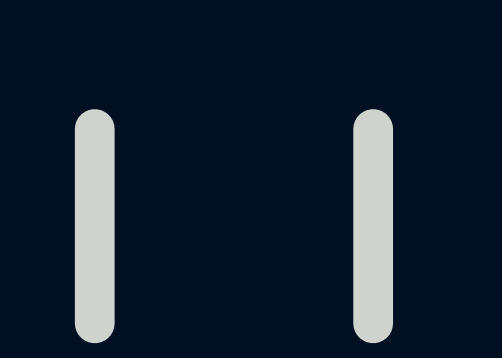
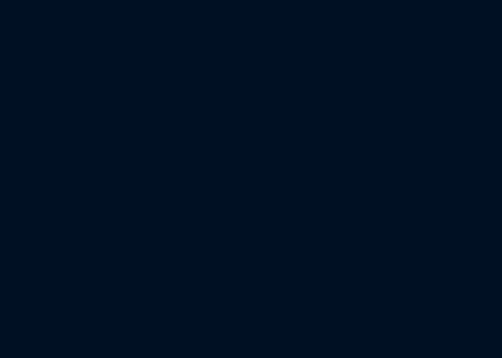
board edge: (94, 129) (94, 323) -> none
board edge: (373, 129) (373, 323) -> none

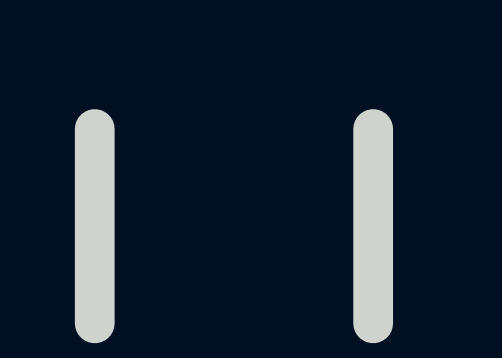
board edge: none -> (94, 129) (94, 323)
board edge: none -> (373, 129) (373, 323)

